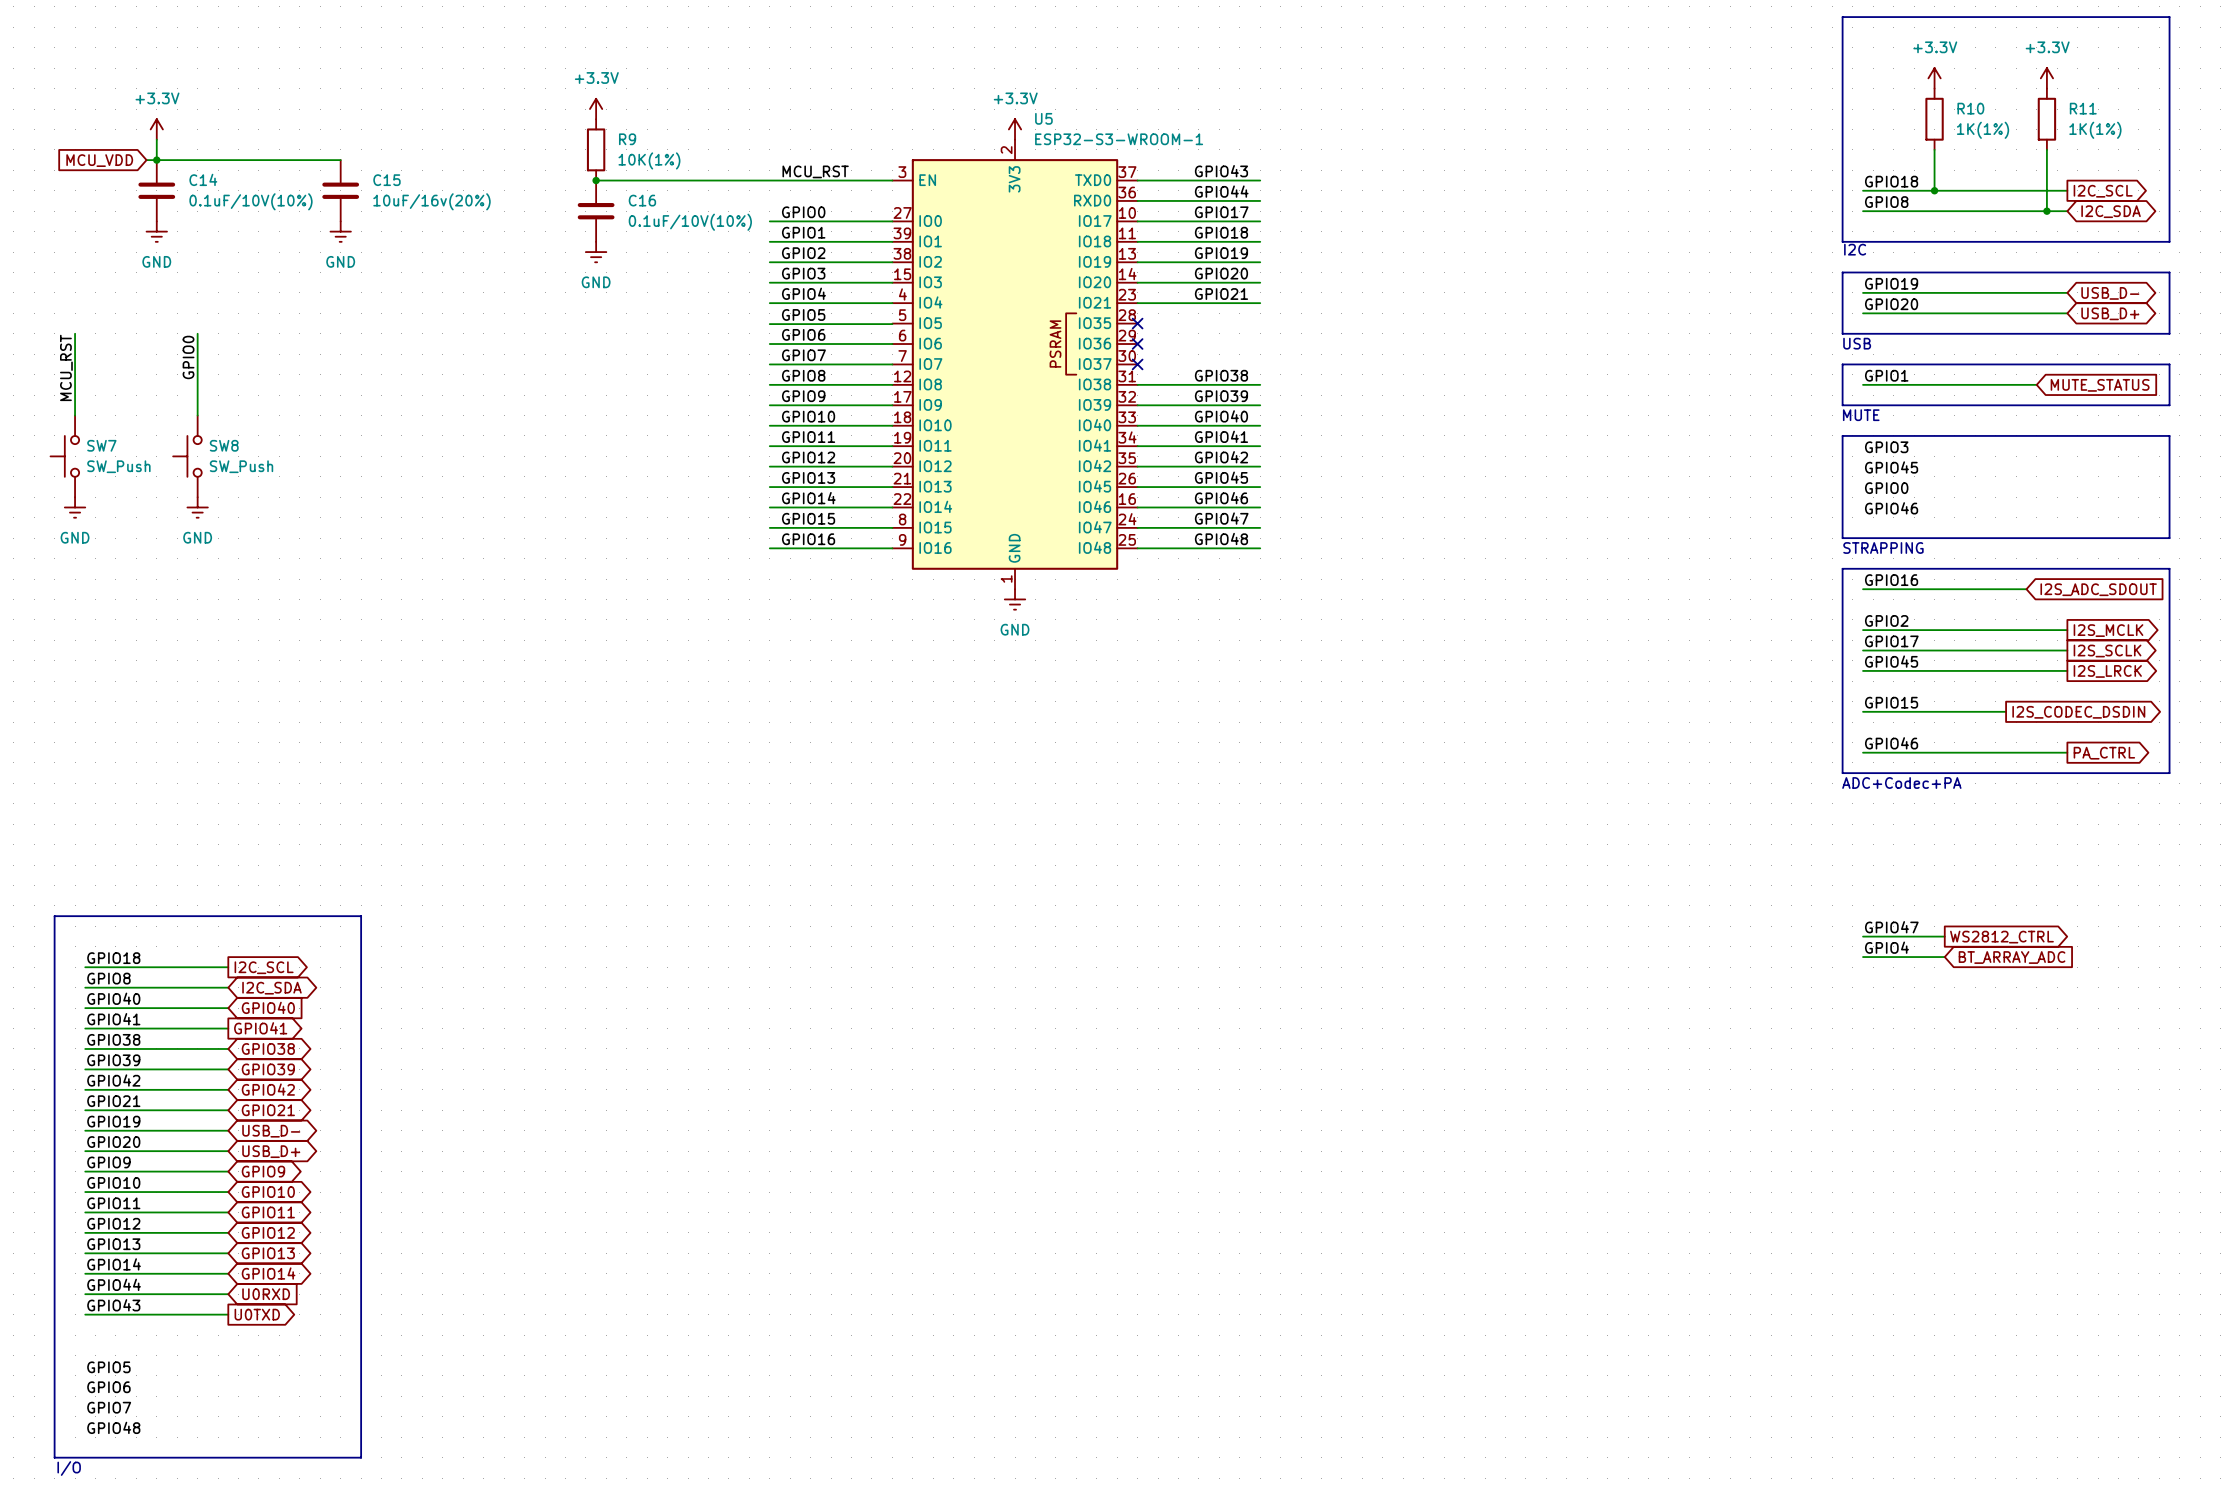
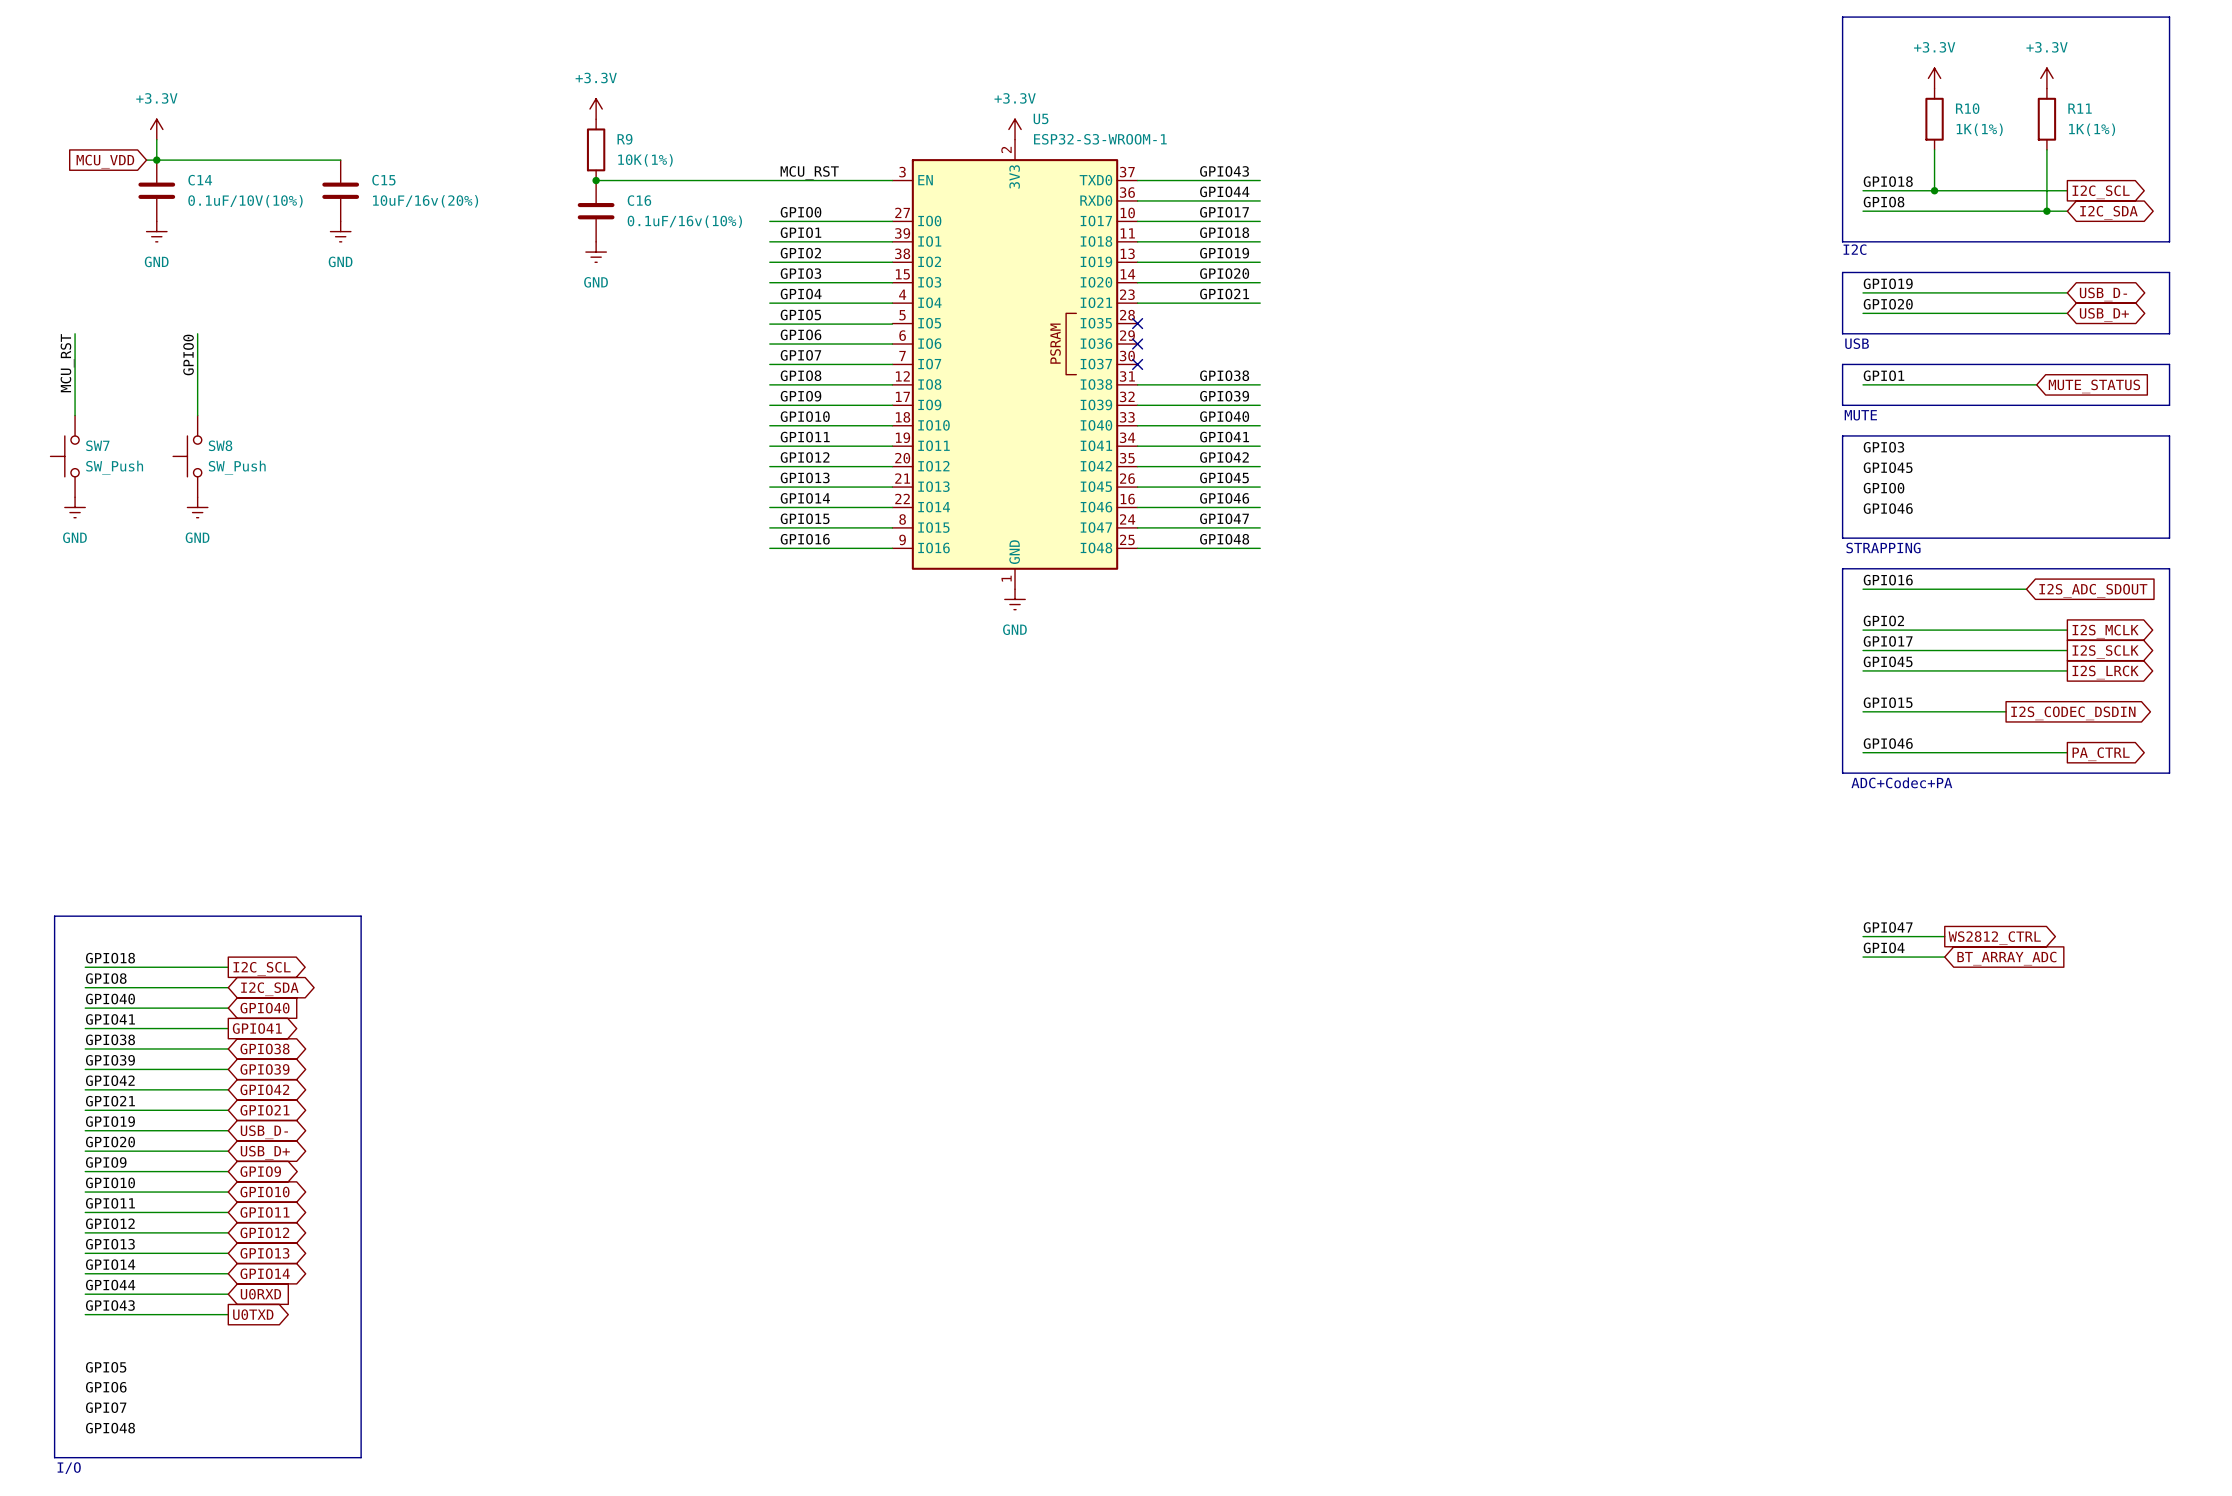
C16 value: 0.1uF/10V(10%) (690, 222) -> 0.1uF/16v(10%) (684, 221)

